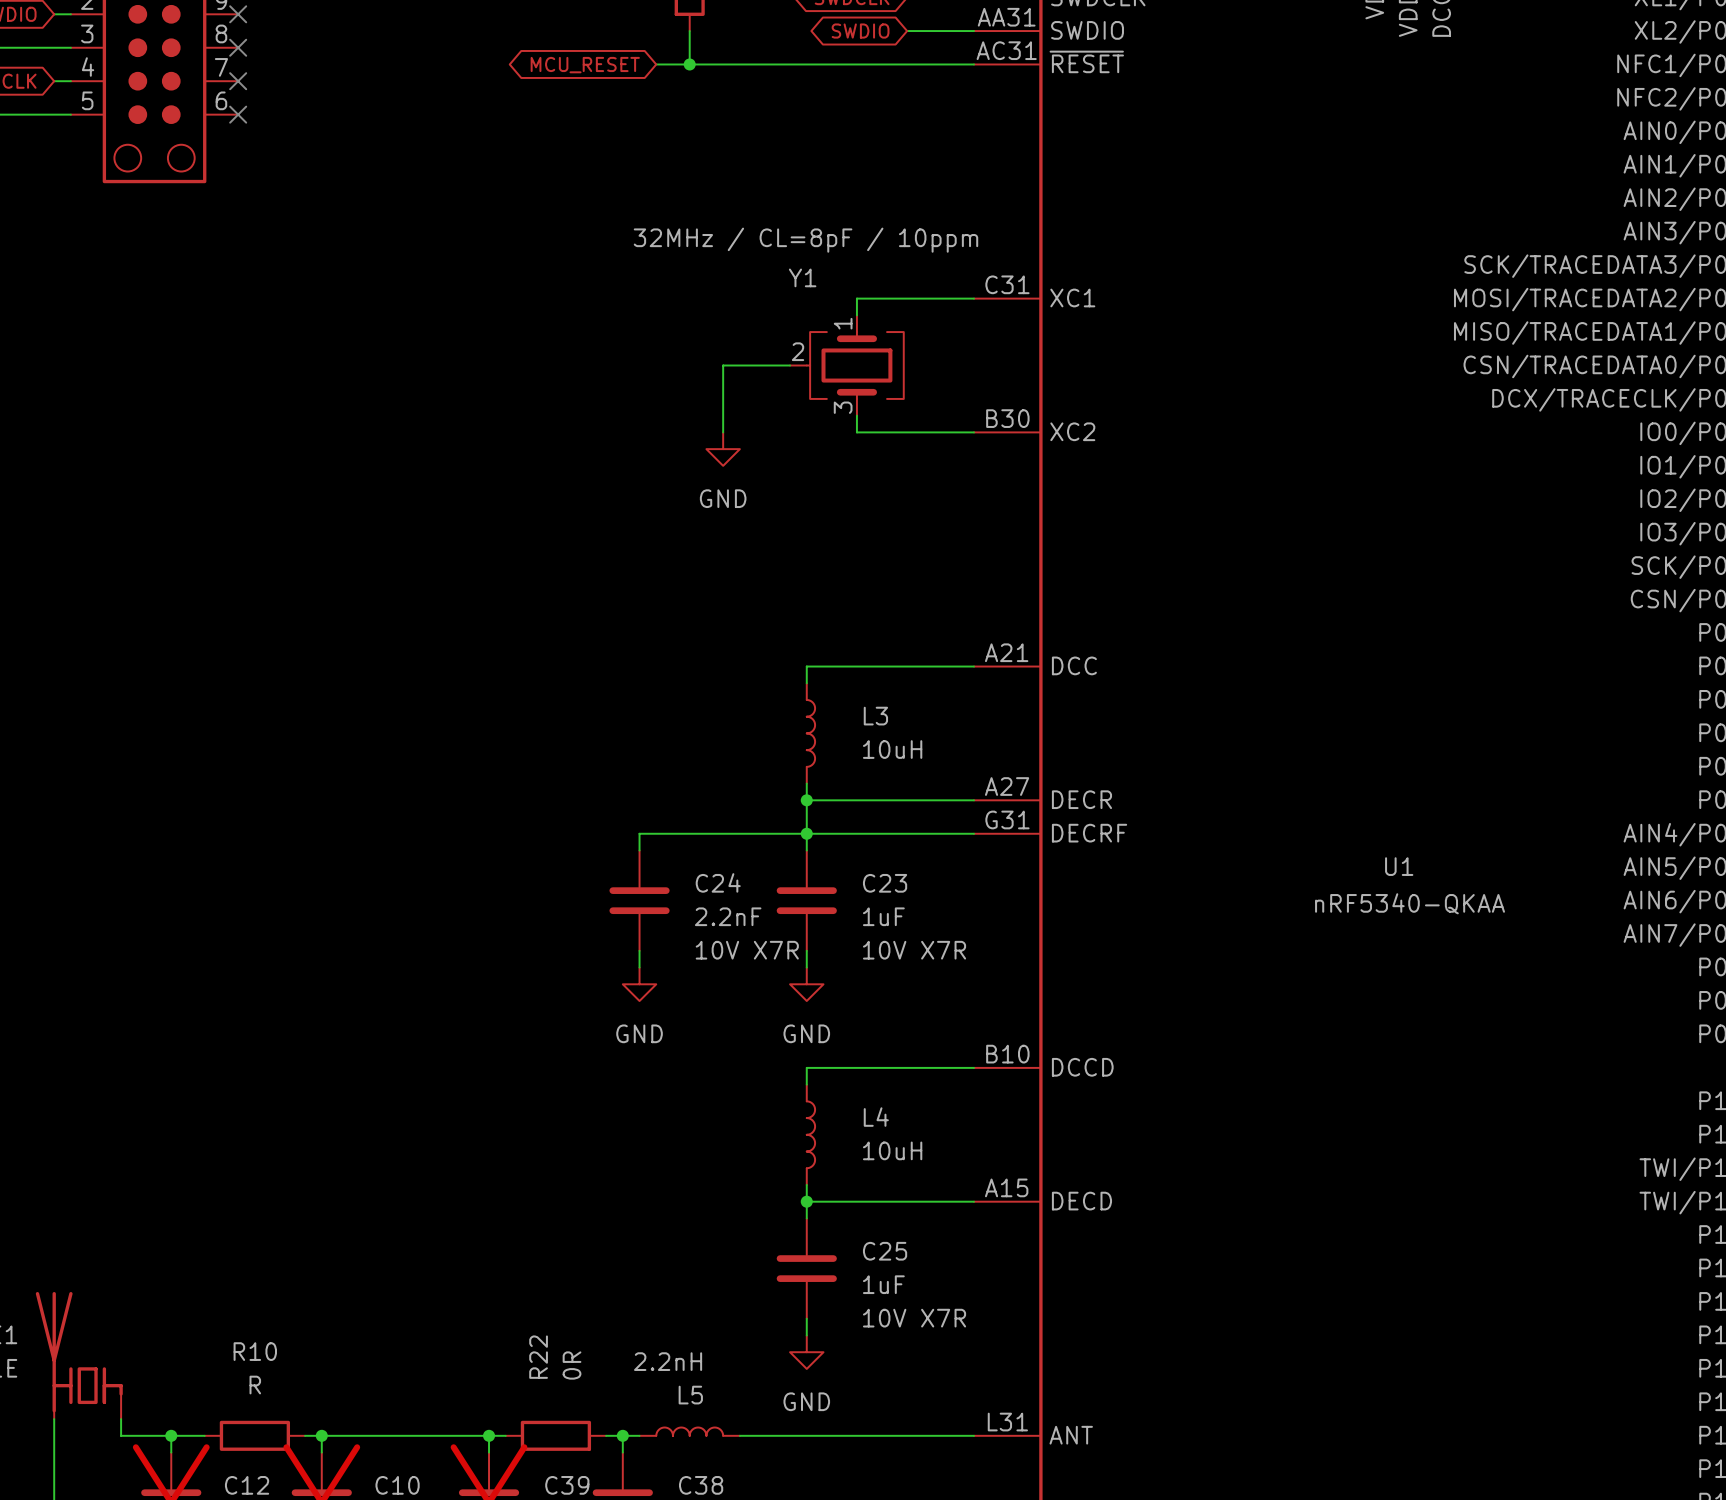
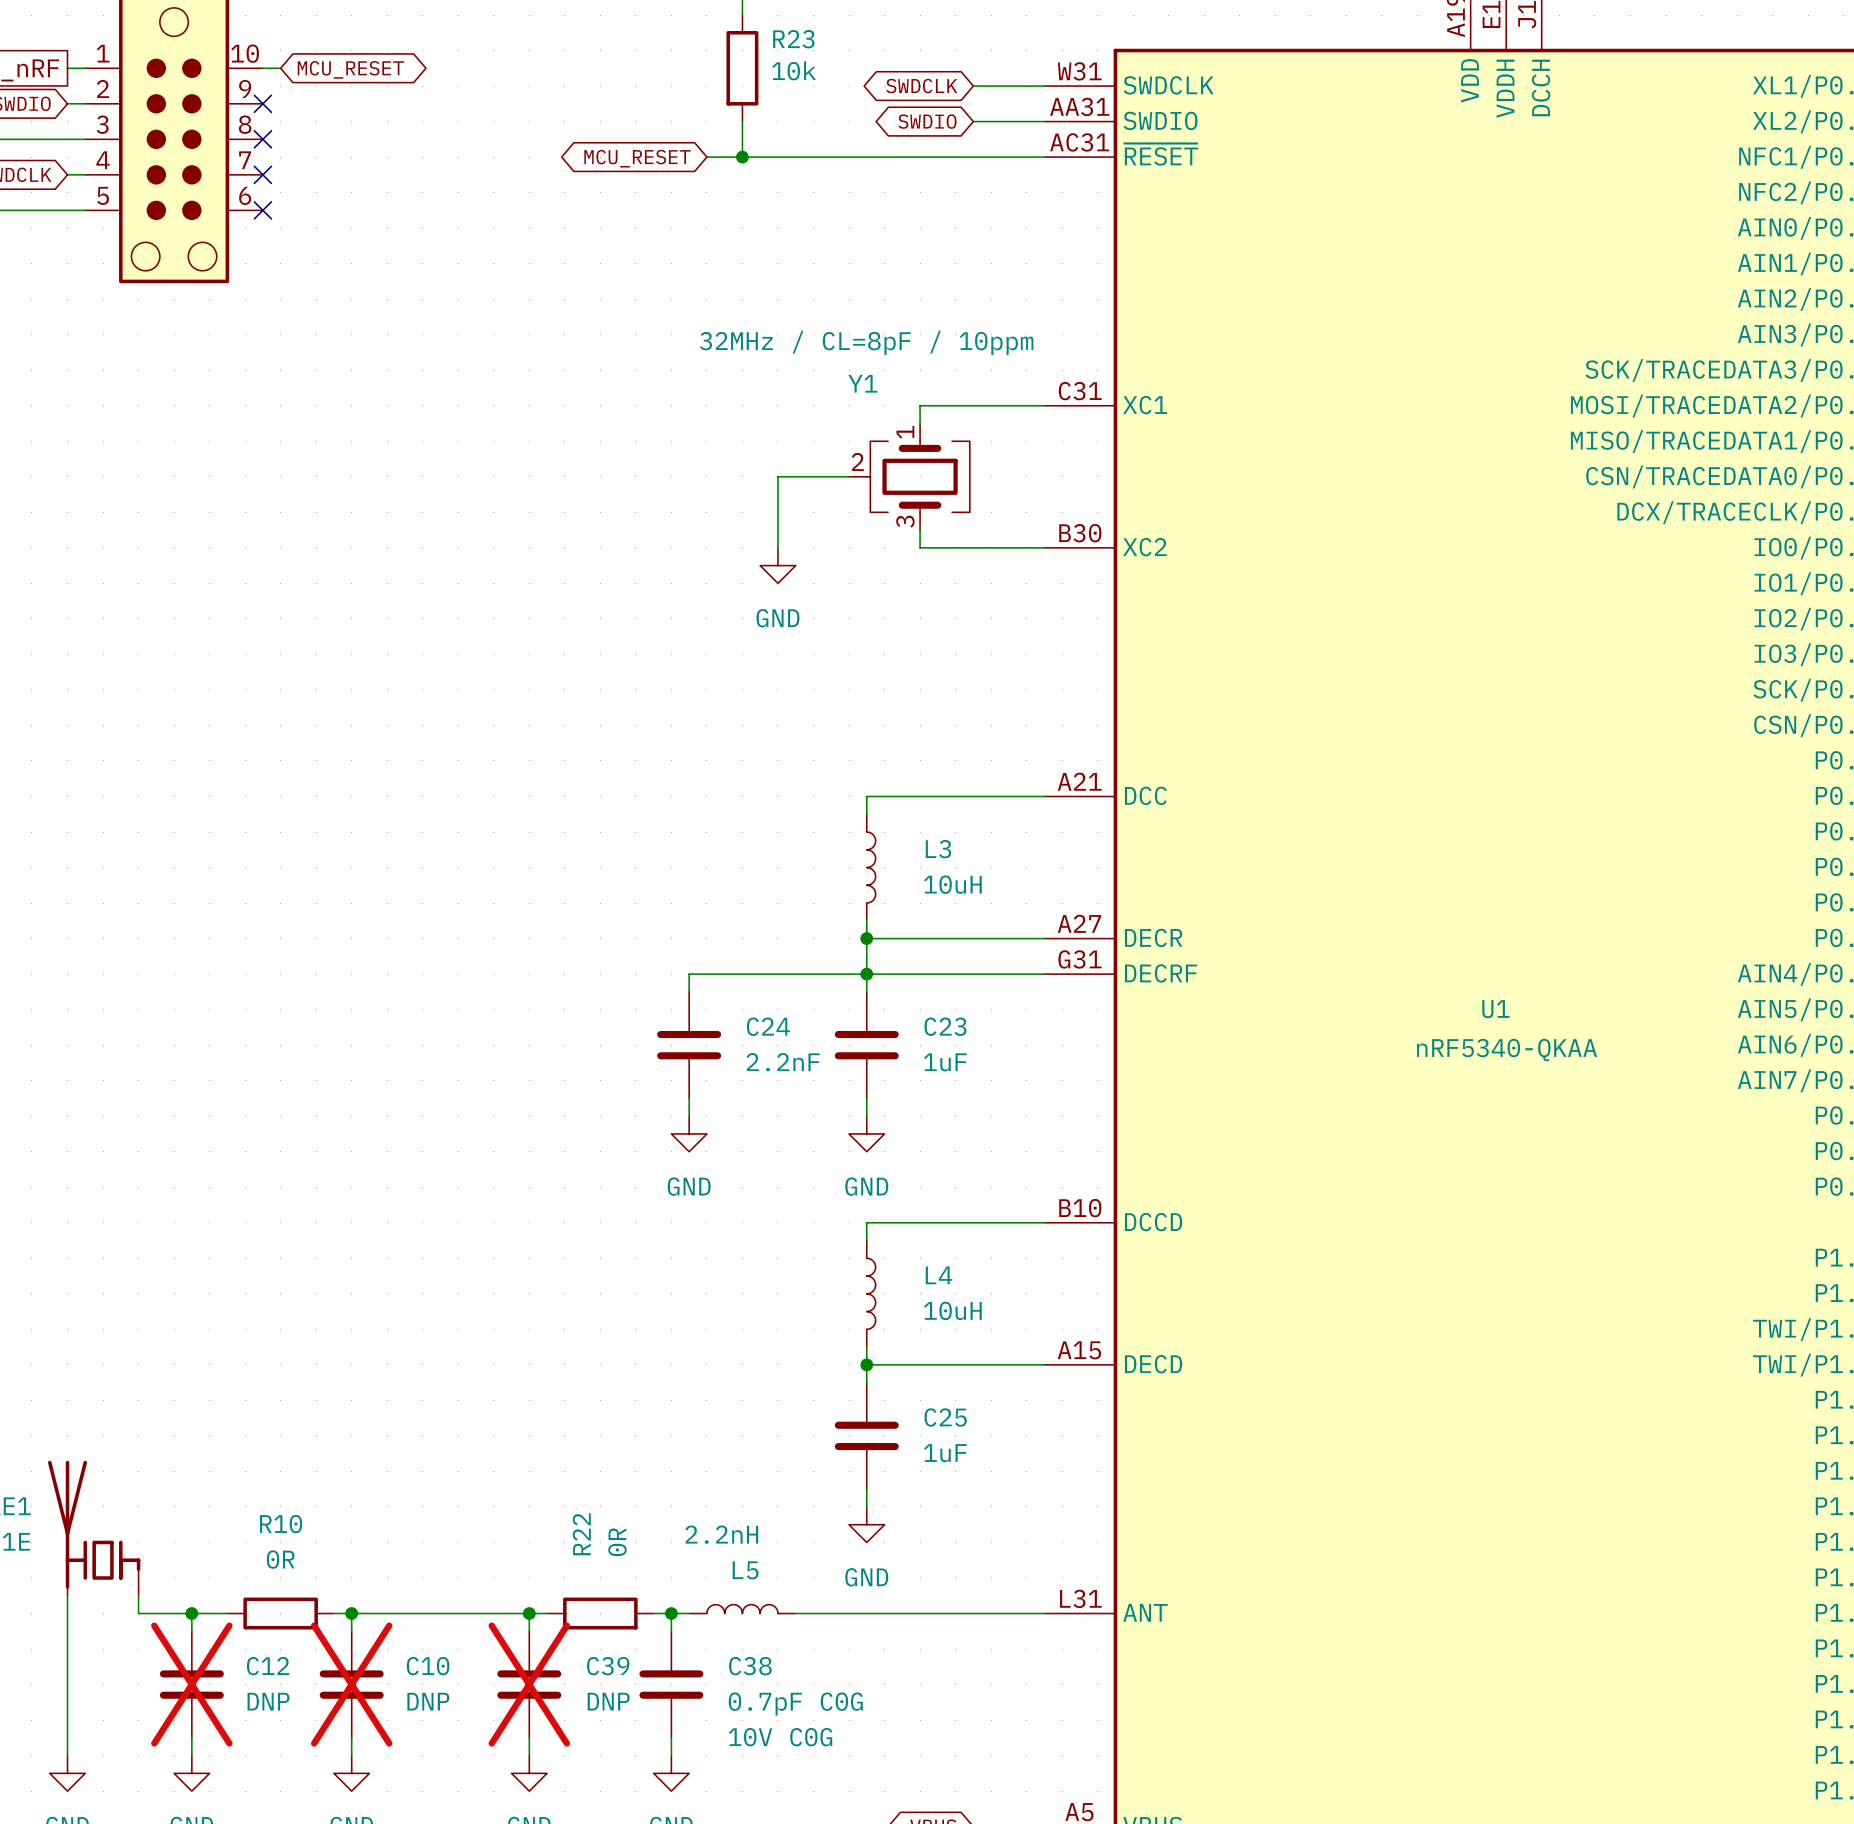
C24 text: 10V X7R (747, 950) -> none
C23 text: 10V X7R (914, 950) -> none
C25 text: 10V X7R (914, 1318) -> none
R10 value: R (255, 1385) -> 0R (280, 1559)

